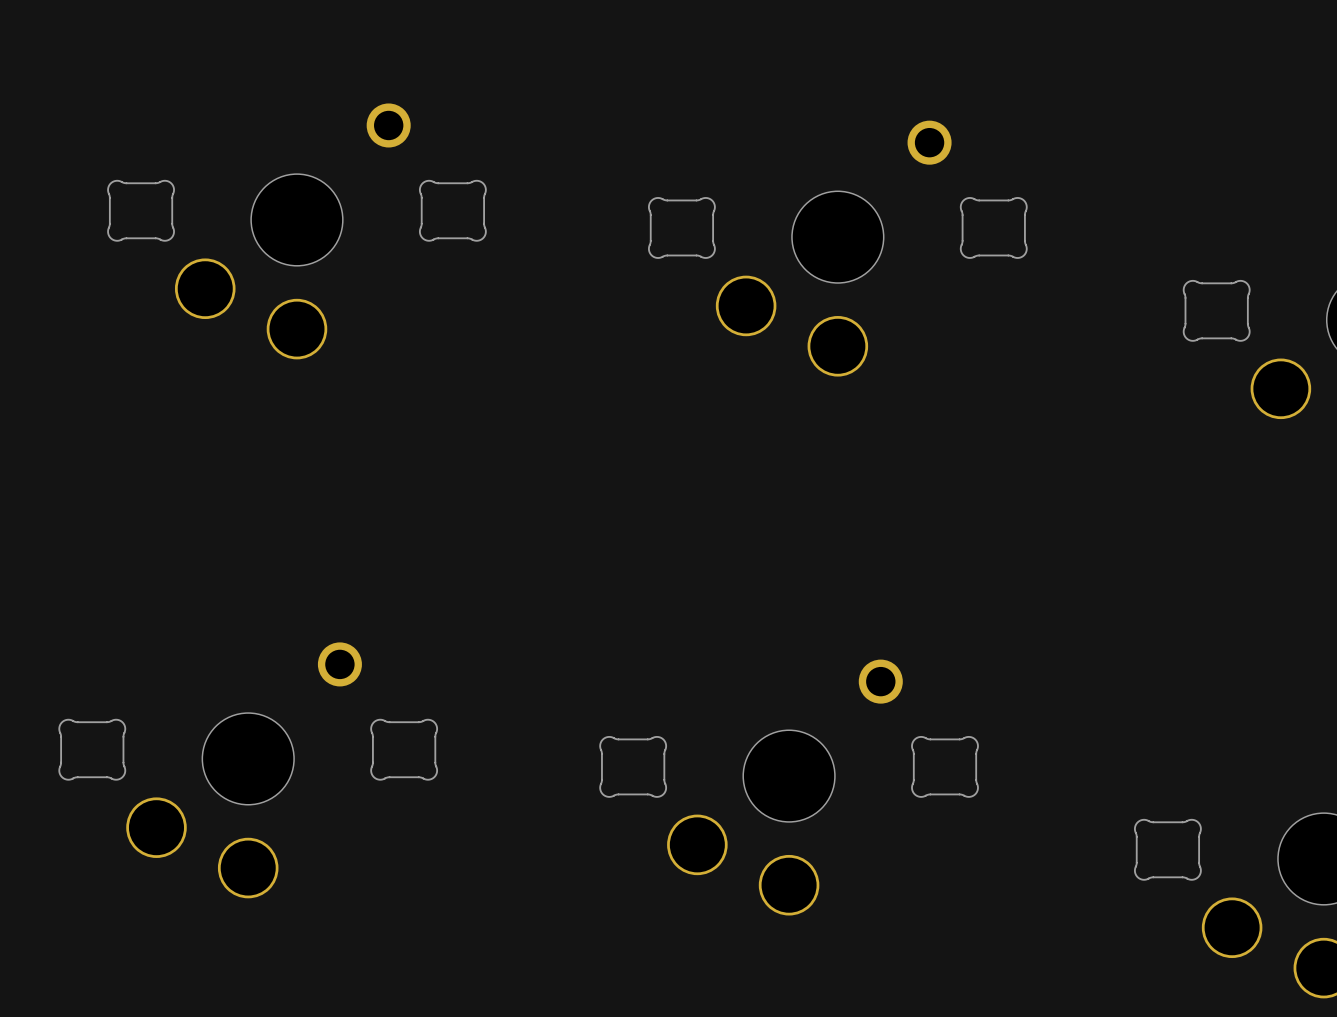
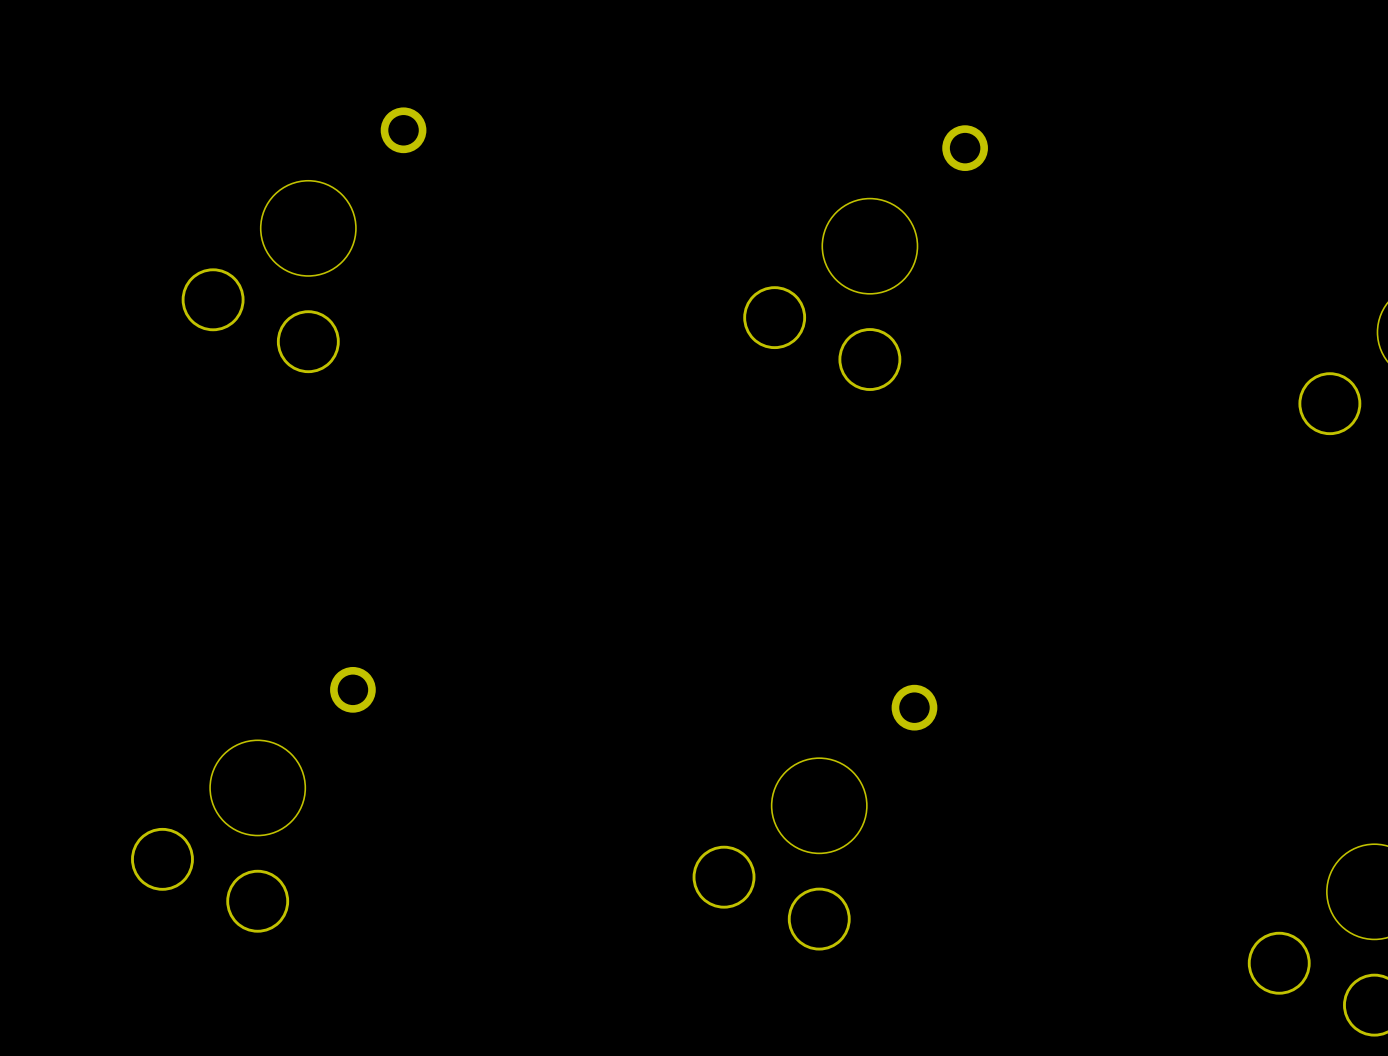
part: (141, 210) -> none
part: (452, 210) -> none
part: (681, 227) -> none
part: (993, 227) -> none
part: (1216, 310) -> none
part: (92, 749) -> none
part: (404, 749) -> none
part: (633, 766) -> none
part: (945, 766) -> none
part: (1167, 849) -> none

